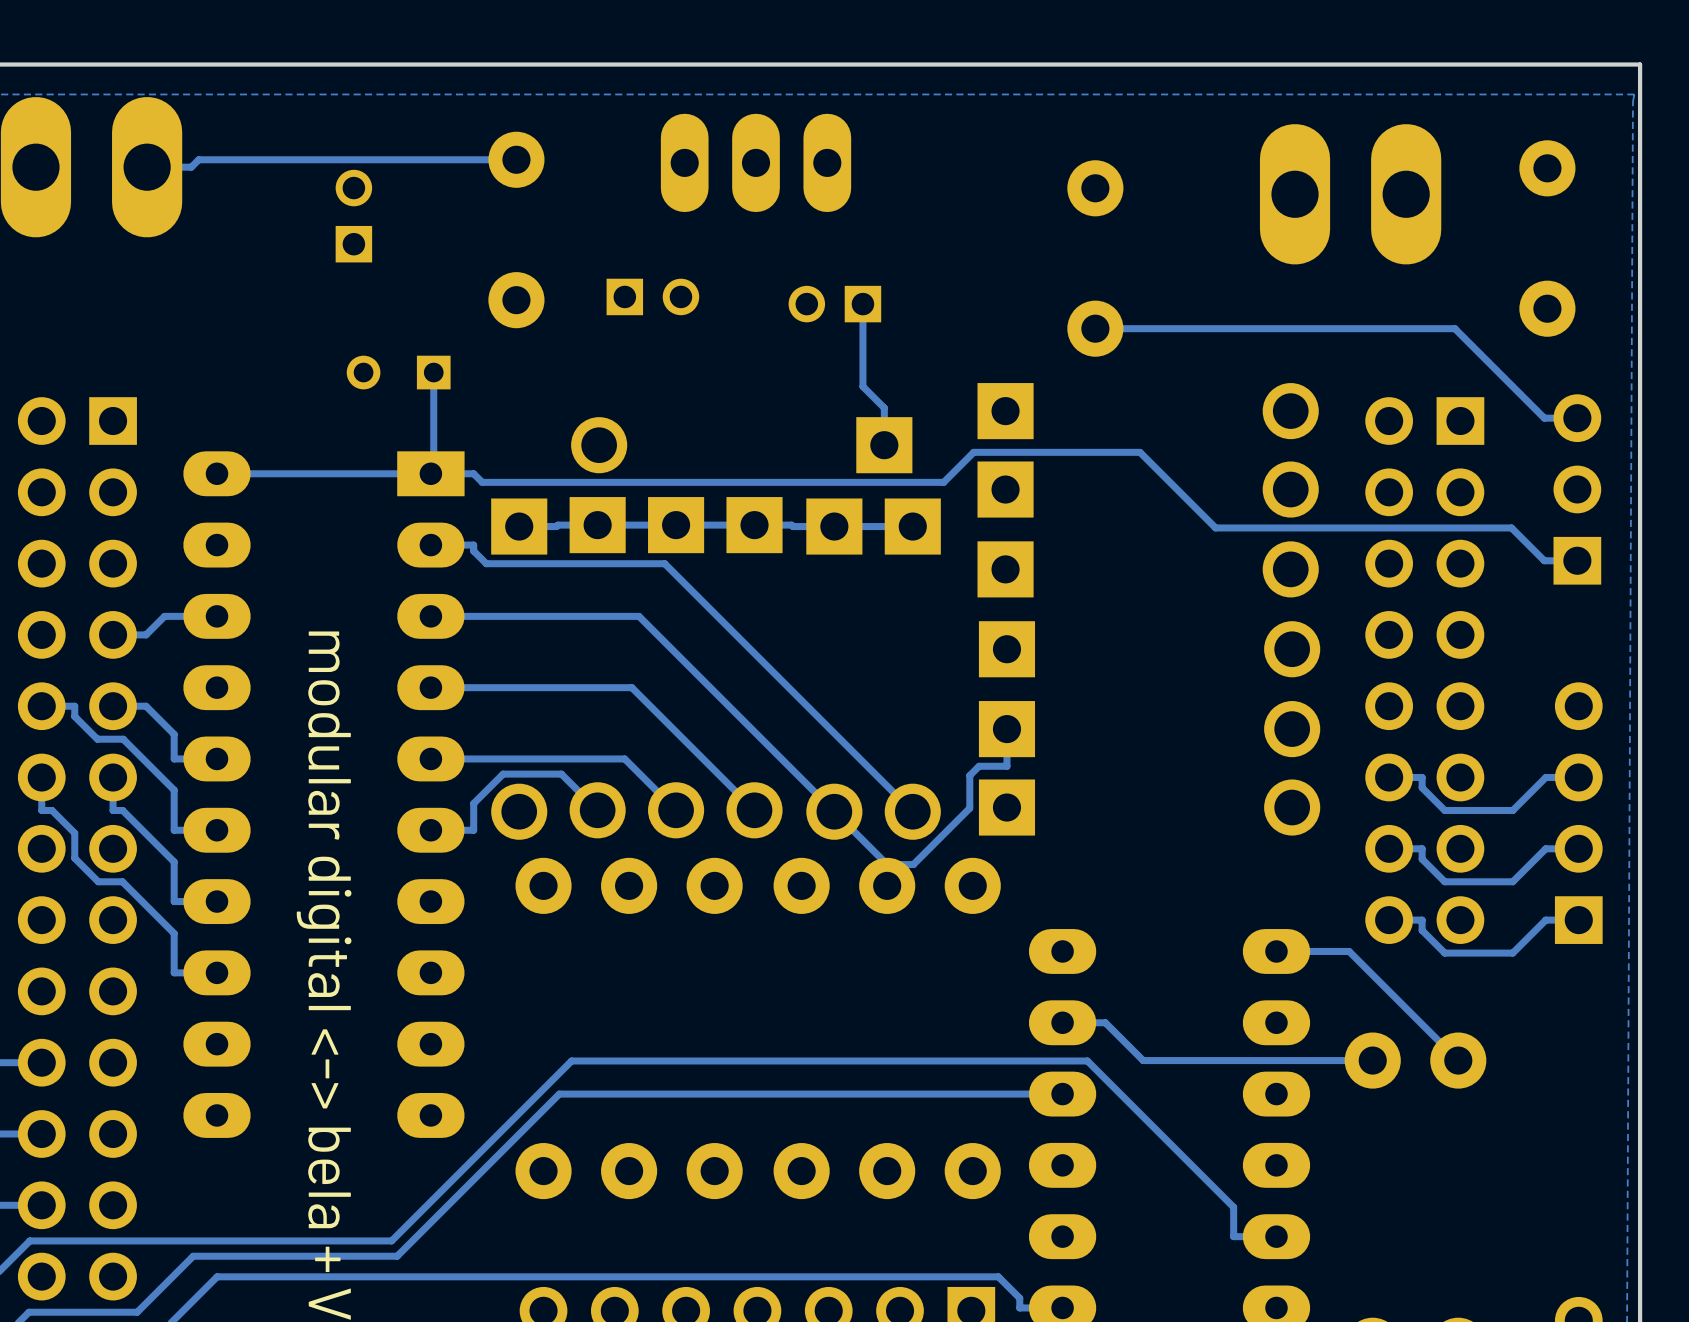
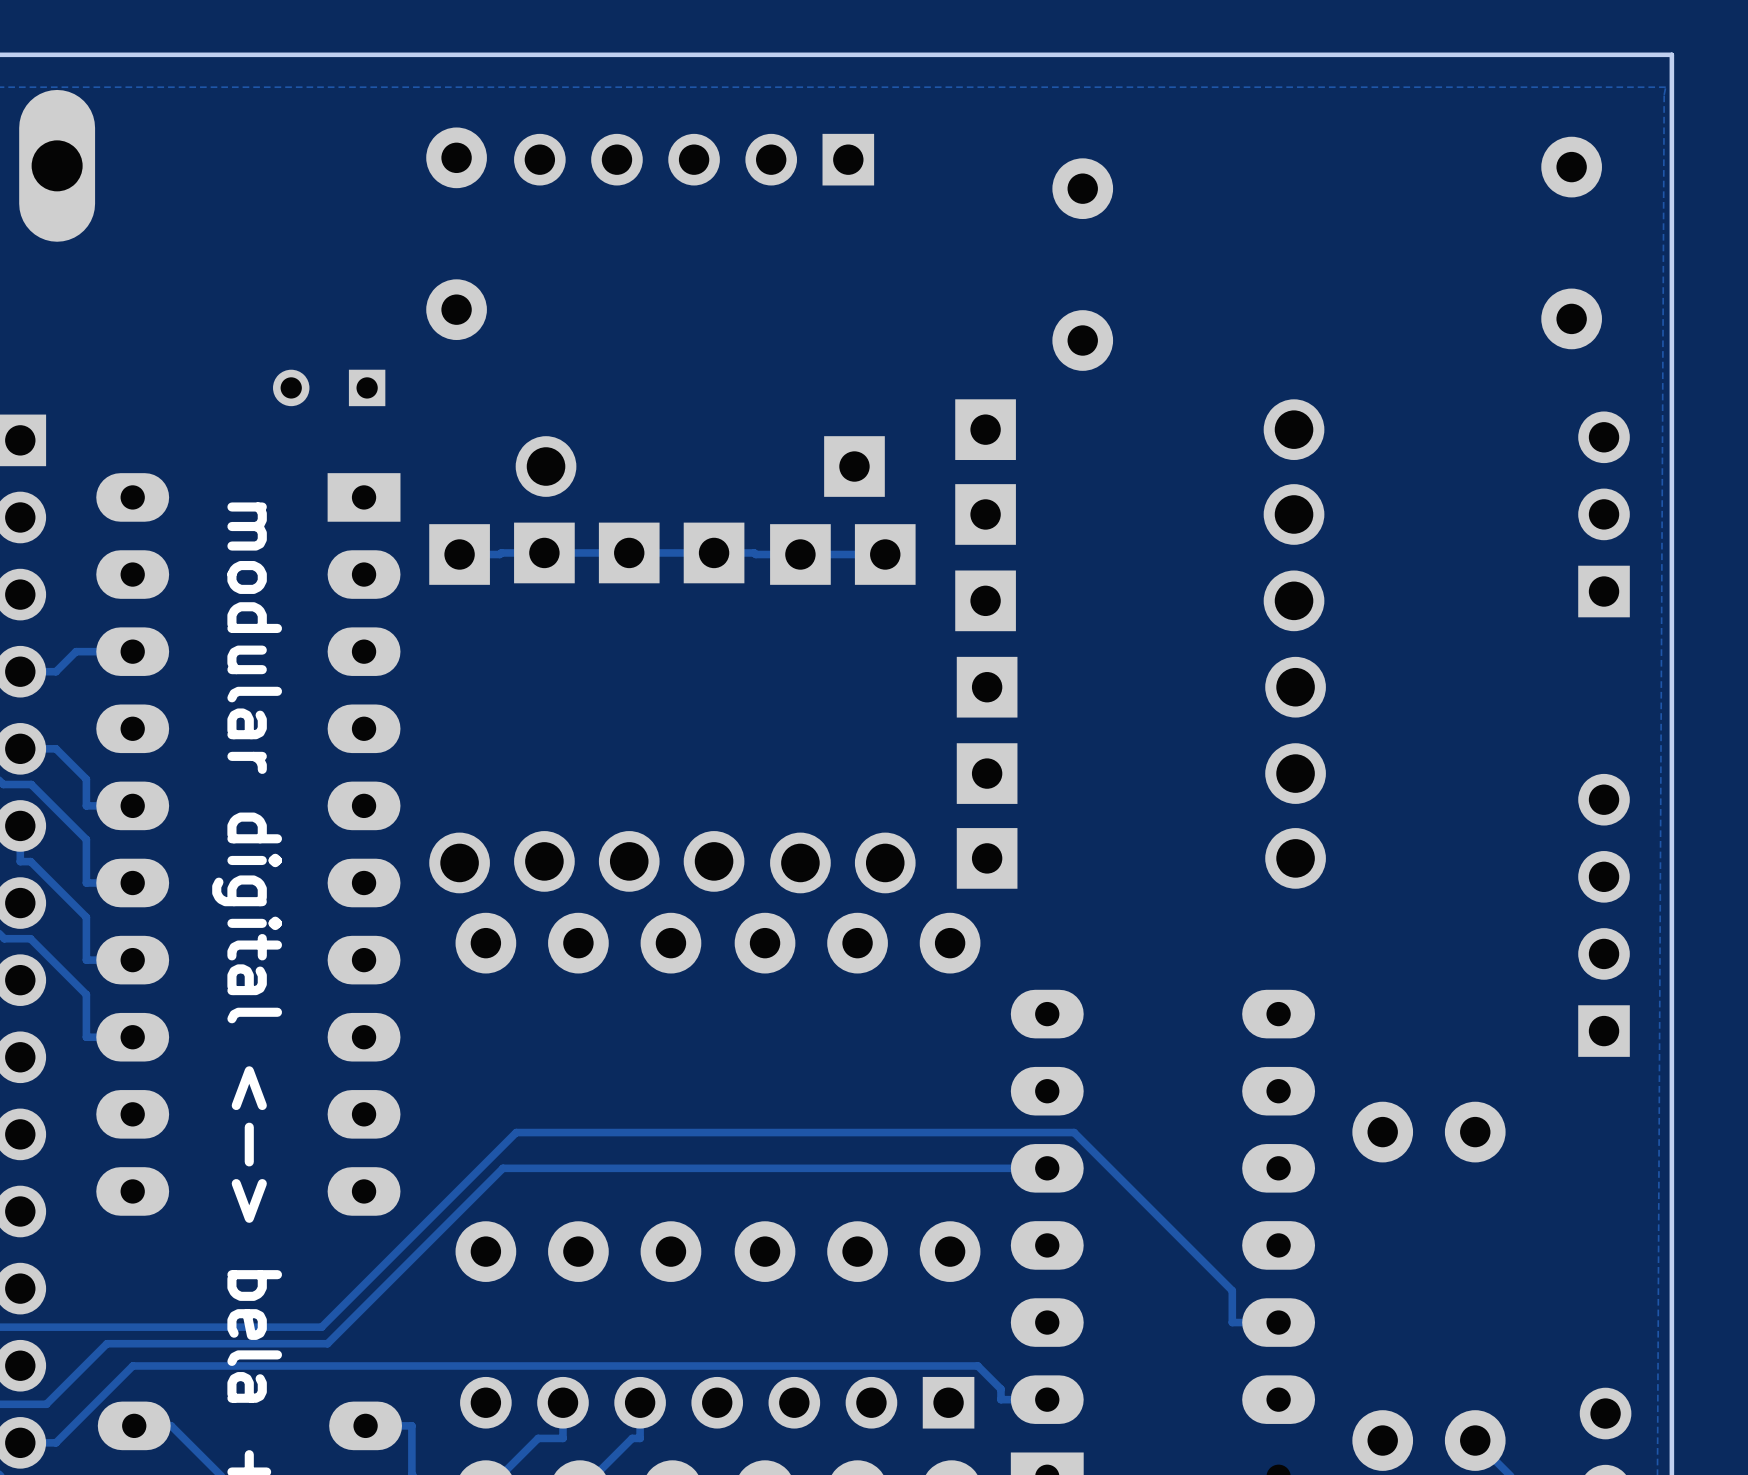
part footprint: [660, 113, 852, 213] -> [514, 133, 875, 186]
track: (516, 159) (198, 159) (191, 167) (147, 167) -> none
part: (1350, 194) -> none
part: (353, 216) -> none
part: (652, 296) -> none
part: (834, 304) -> none
track: (862, 304) (862, 386) (884, 408) (884, 445) -> none
track: (1095, 328) (1454, 328) (1544, 418) (1577, 418) -> none
track: (433, 372) (433, 455) (452, 473) -> none
track: (216, 473) (473, 473) (482, 482) (943, 482) (973, 452) (1140, 452) (1215, 527) (1511, 527) (1544, 560) (1577, 560) -> none
track: (430, 545) (473, 545) (473, 551) (486, 563) (664, 563) (912, 811) -> none
track: (430, 616) (639, 616) (887, 864) -> none
part: (1424, 670) -> none
track: (430, 687) (631, 687) (754, 810) -> none
track: (1006, 729) (1006, 766) (979, 766) (969, 775) (969, 808) (913, 864) (887, 864) -> none
track: (430, 758) (624, 758) (676, 810) -> none
track: (1578, 777) (1545, 777) (1512, 810) (1444, 810) (1422, 787) (1422, 777) (1389, 777) -> none
track: (597, 810) (561, 774) (503, 774) (473, 803) (473, 830) (430, 830) -> none
part position: (1578, 813) -> (1604, 915)
track: (1578, 848) (1545, 848) (1512, 881) (1444, 881) (1422, 859) (1422, 848) (1389, 848) -> none
track: (1578, 920) (1545, 920) (1512, 953) (1444, 953) (1422, 930) (1422, 920) (1389, 920) -> none
track: (1276, 951) (1349, 951) (1458, 1060) -> none
track: (1062, 1022) (1105, 1022) (1143, 1060) (1372, 1060) -> none

